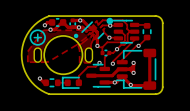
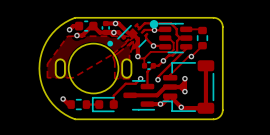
drawing: [30, 29, 46, 46] -> none
text: + (37, 37) -> none

